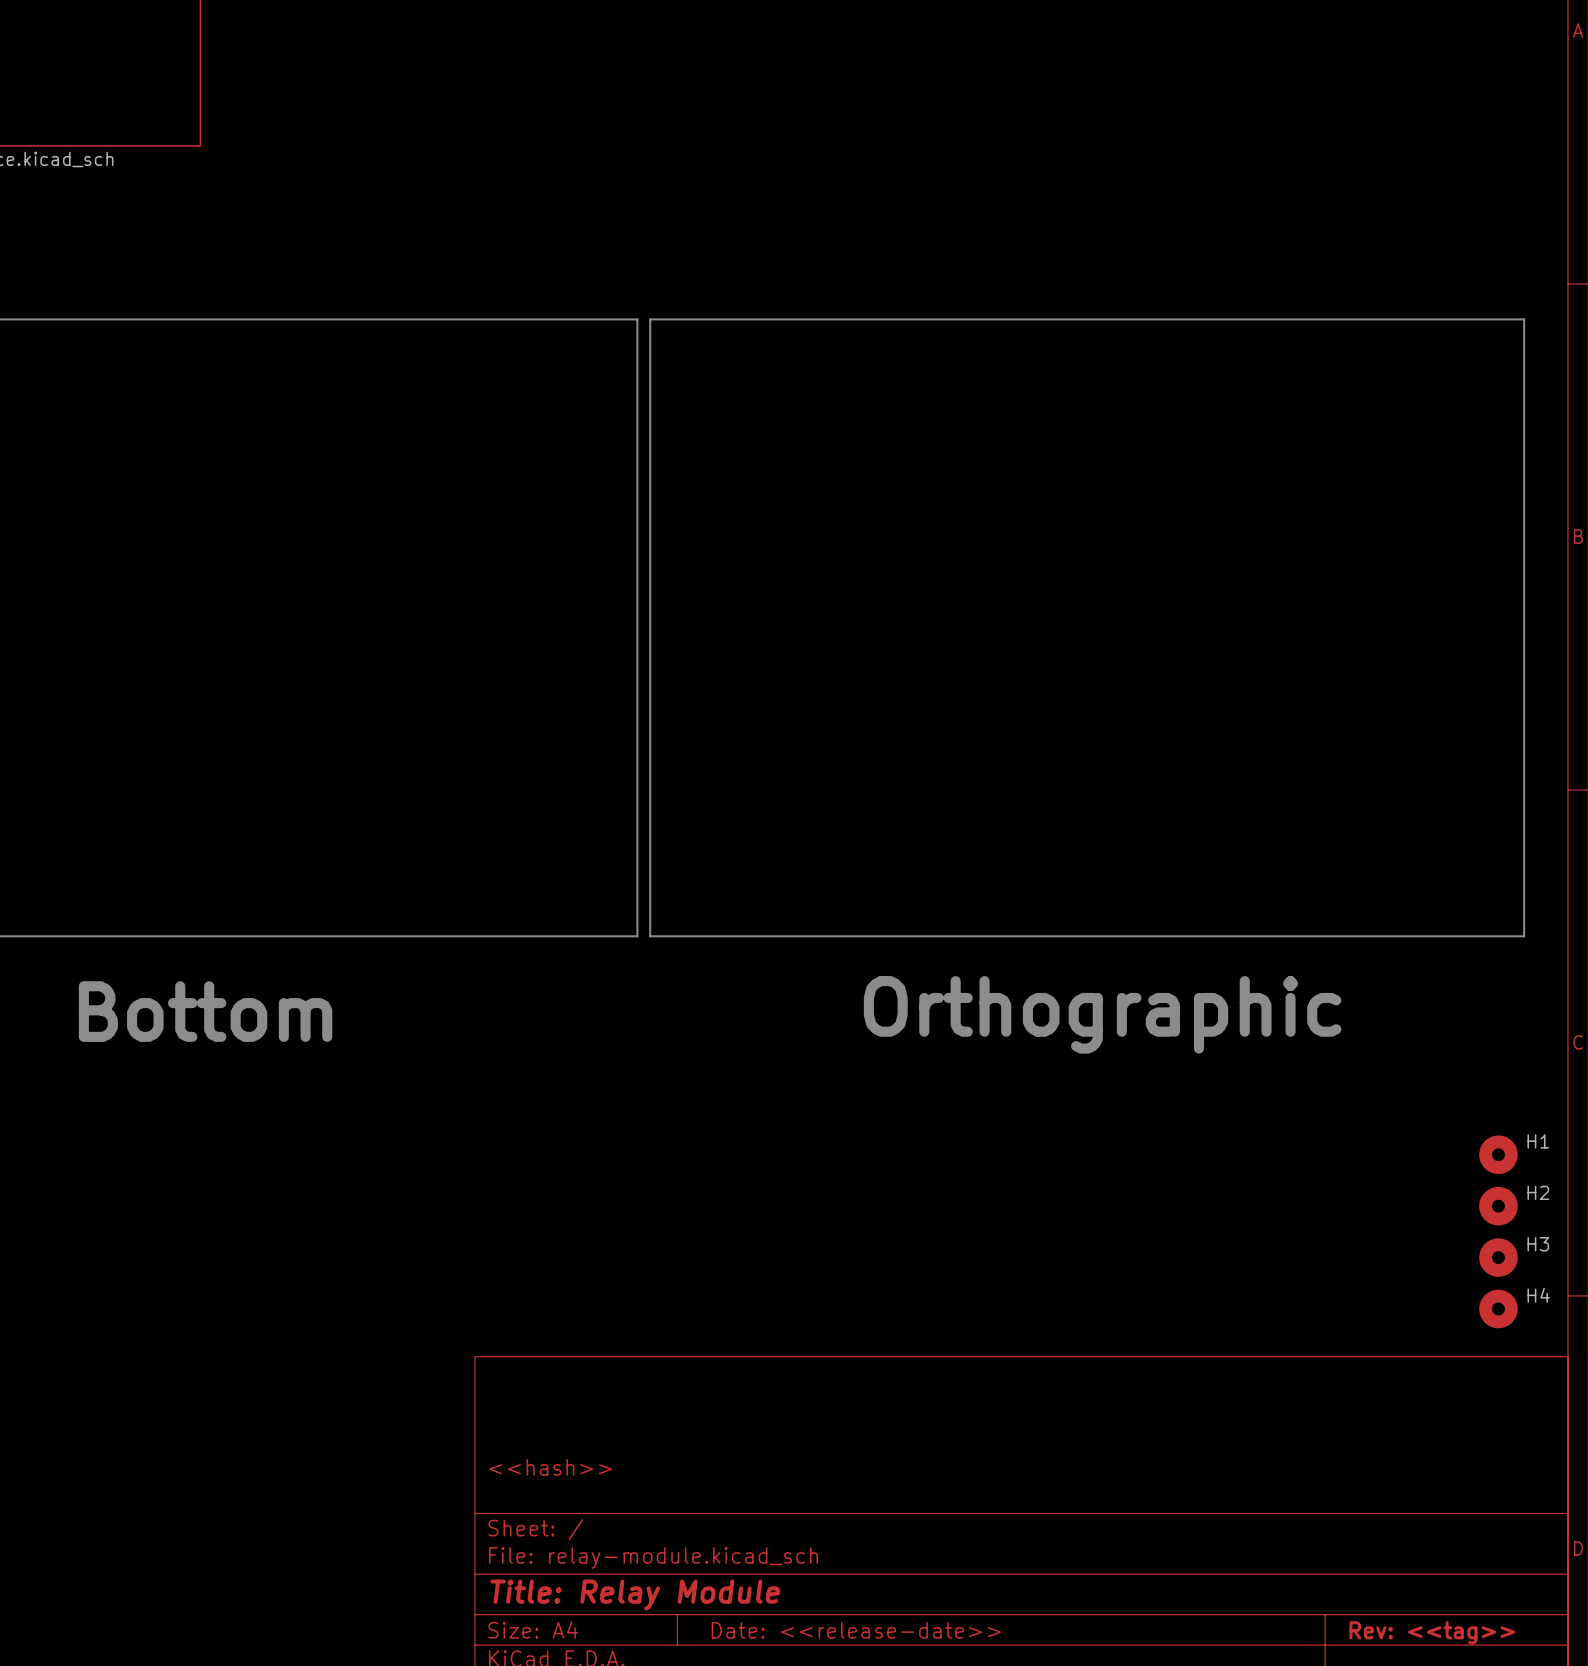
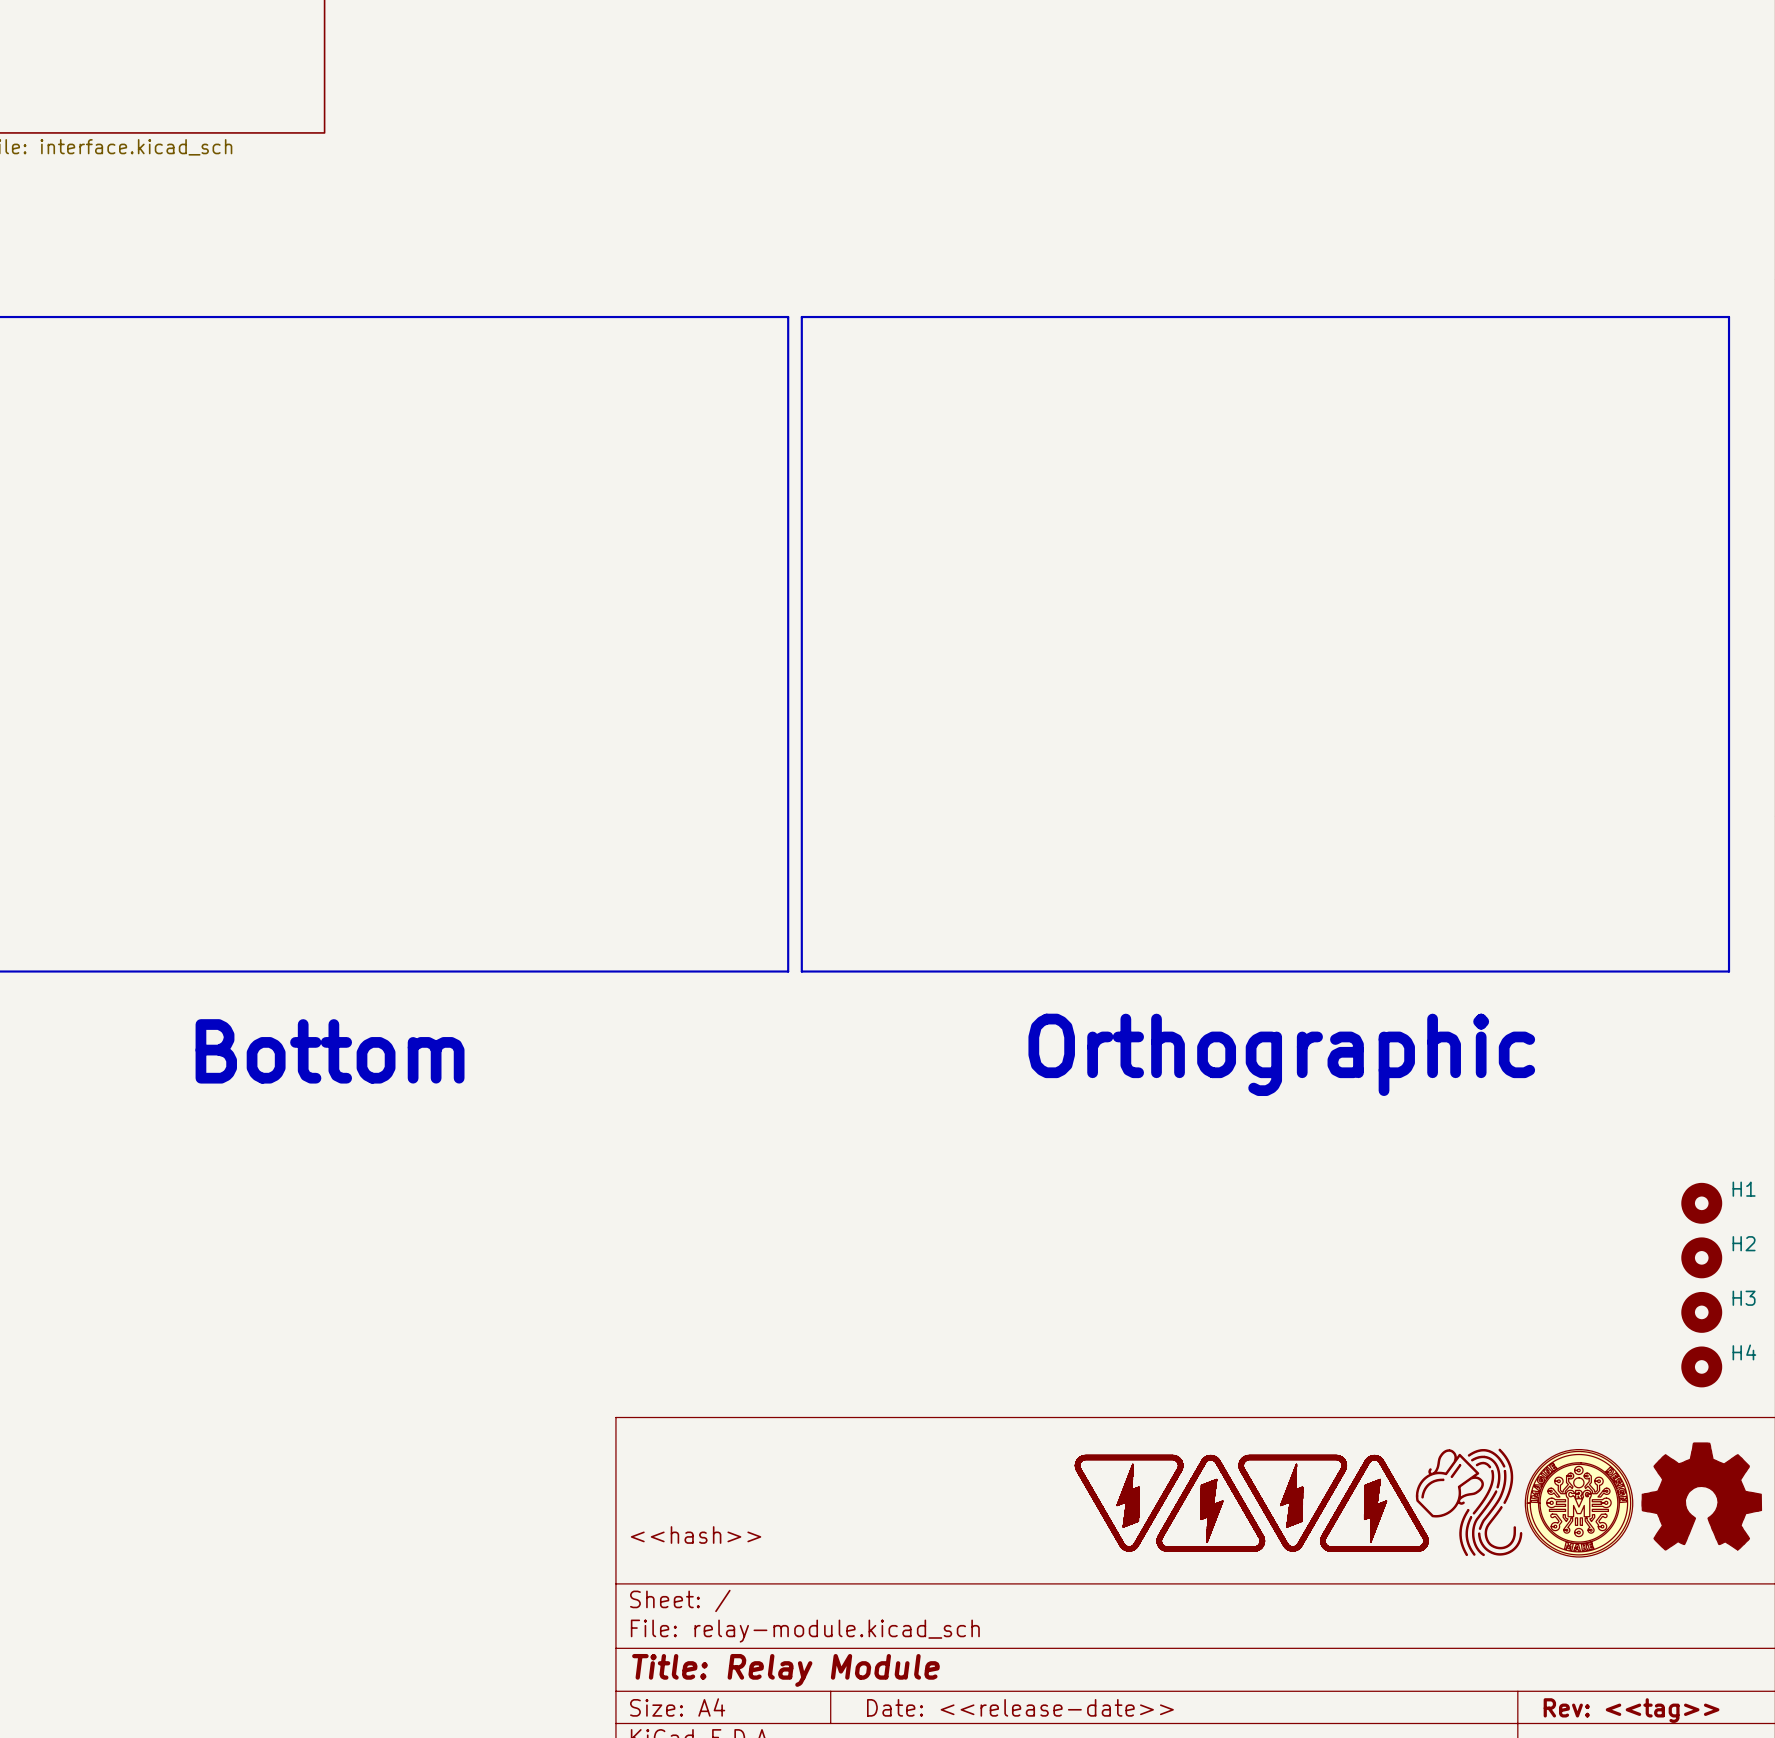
part: none -> (1701, 1496)
part: none -> (1469, 1502)
part: none -> (1129, 1503)
part: none -> (1210, 1503)
part: none -> (1292, 1503)
part: none -> (1374, 1503)
part: none -> (1579, 1503)

